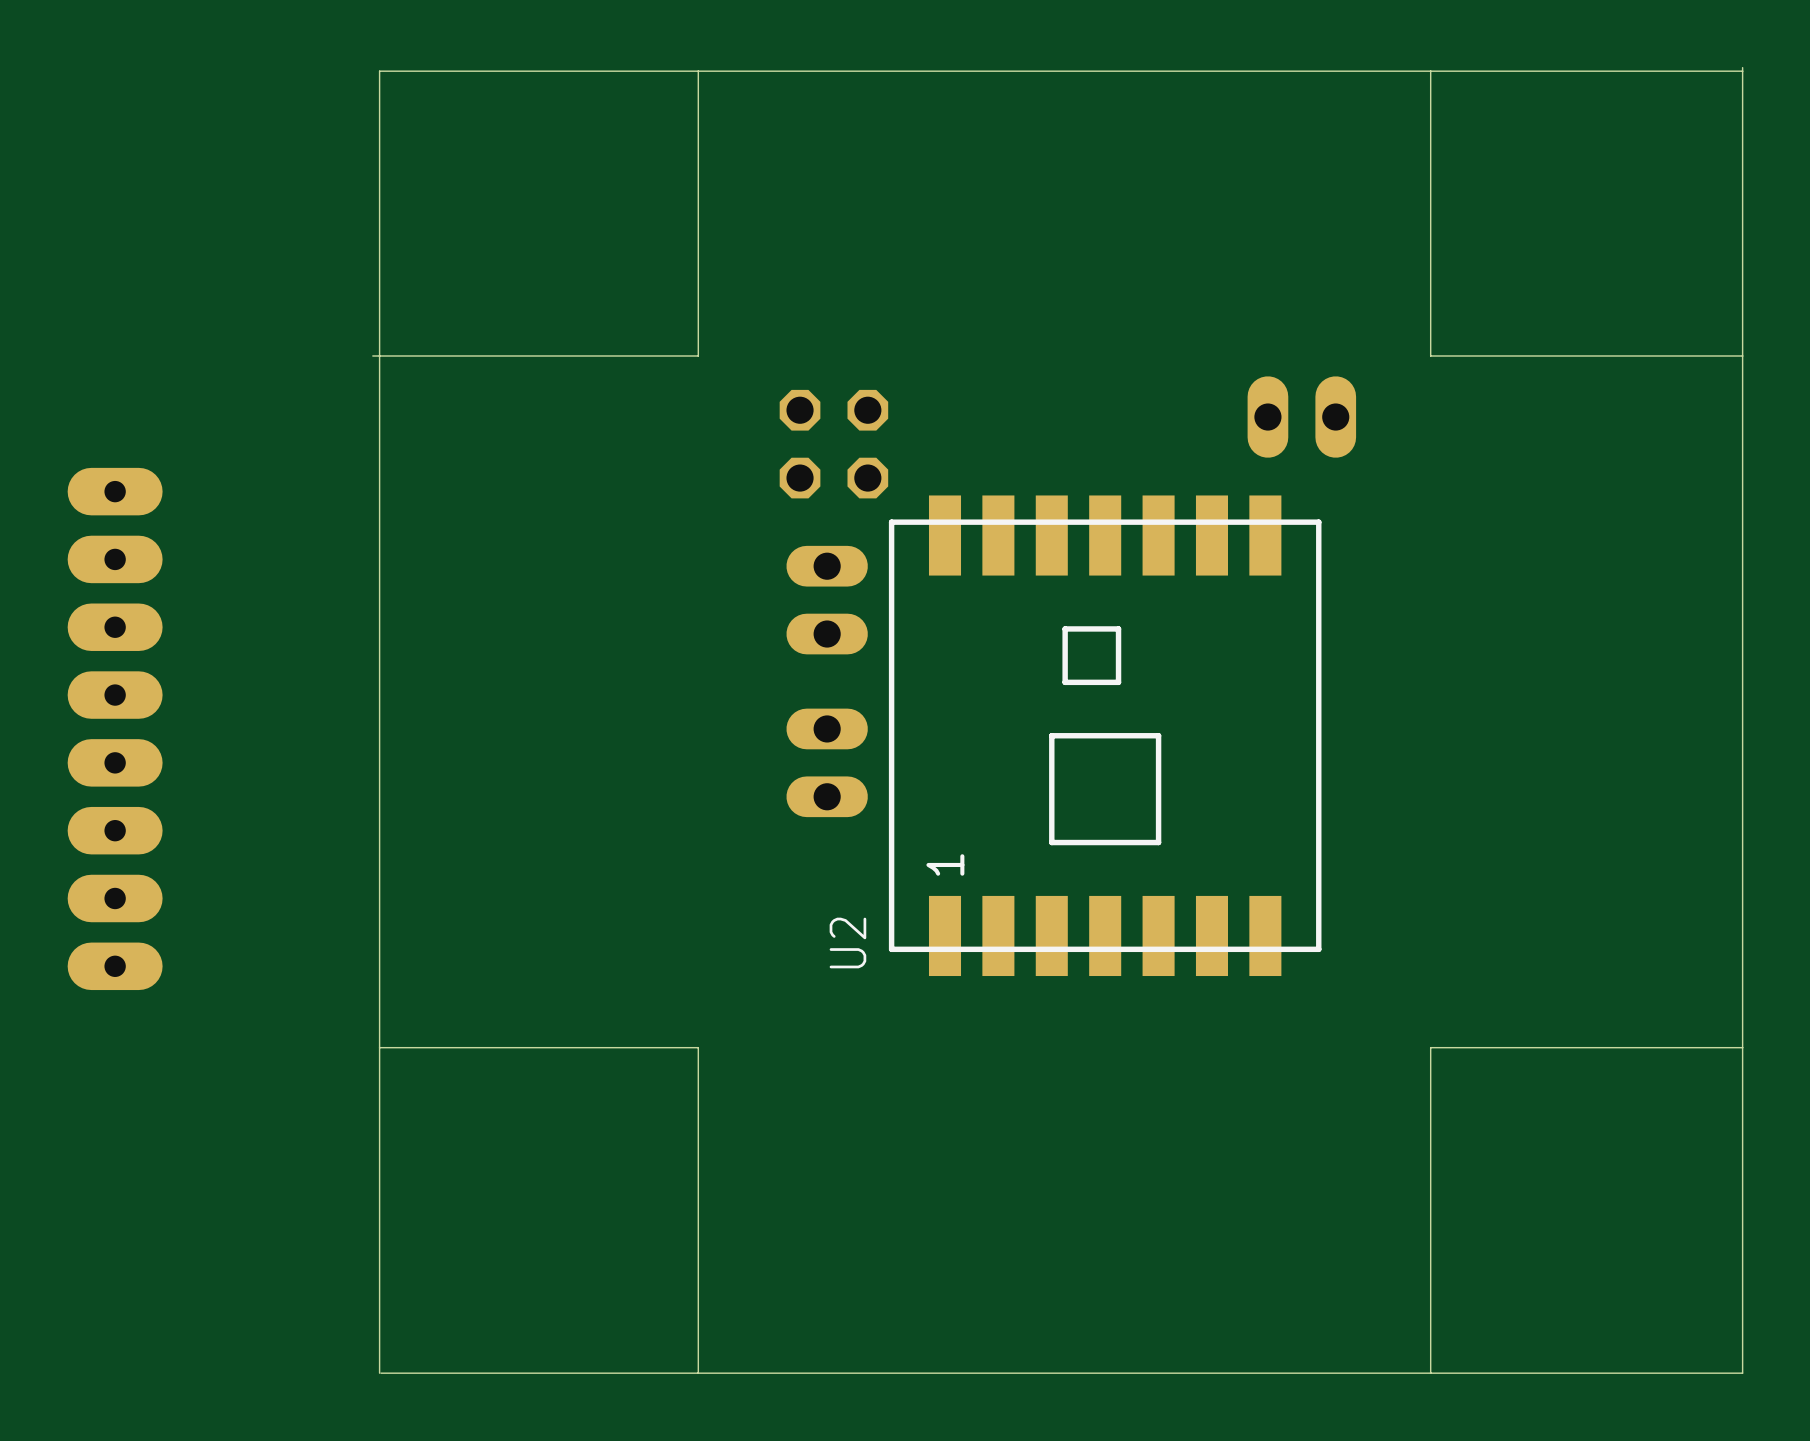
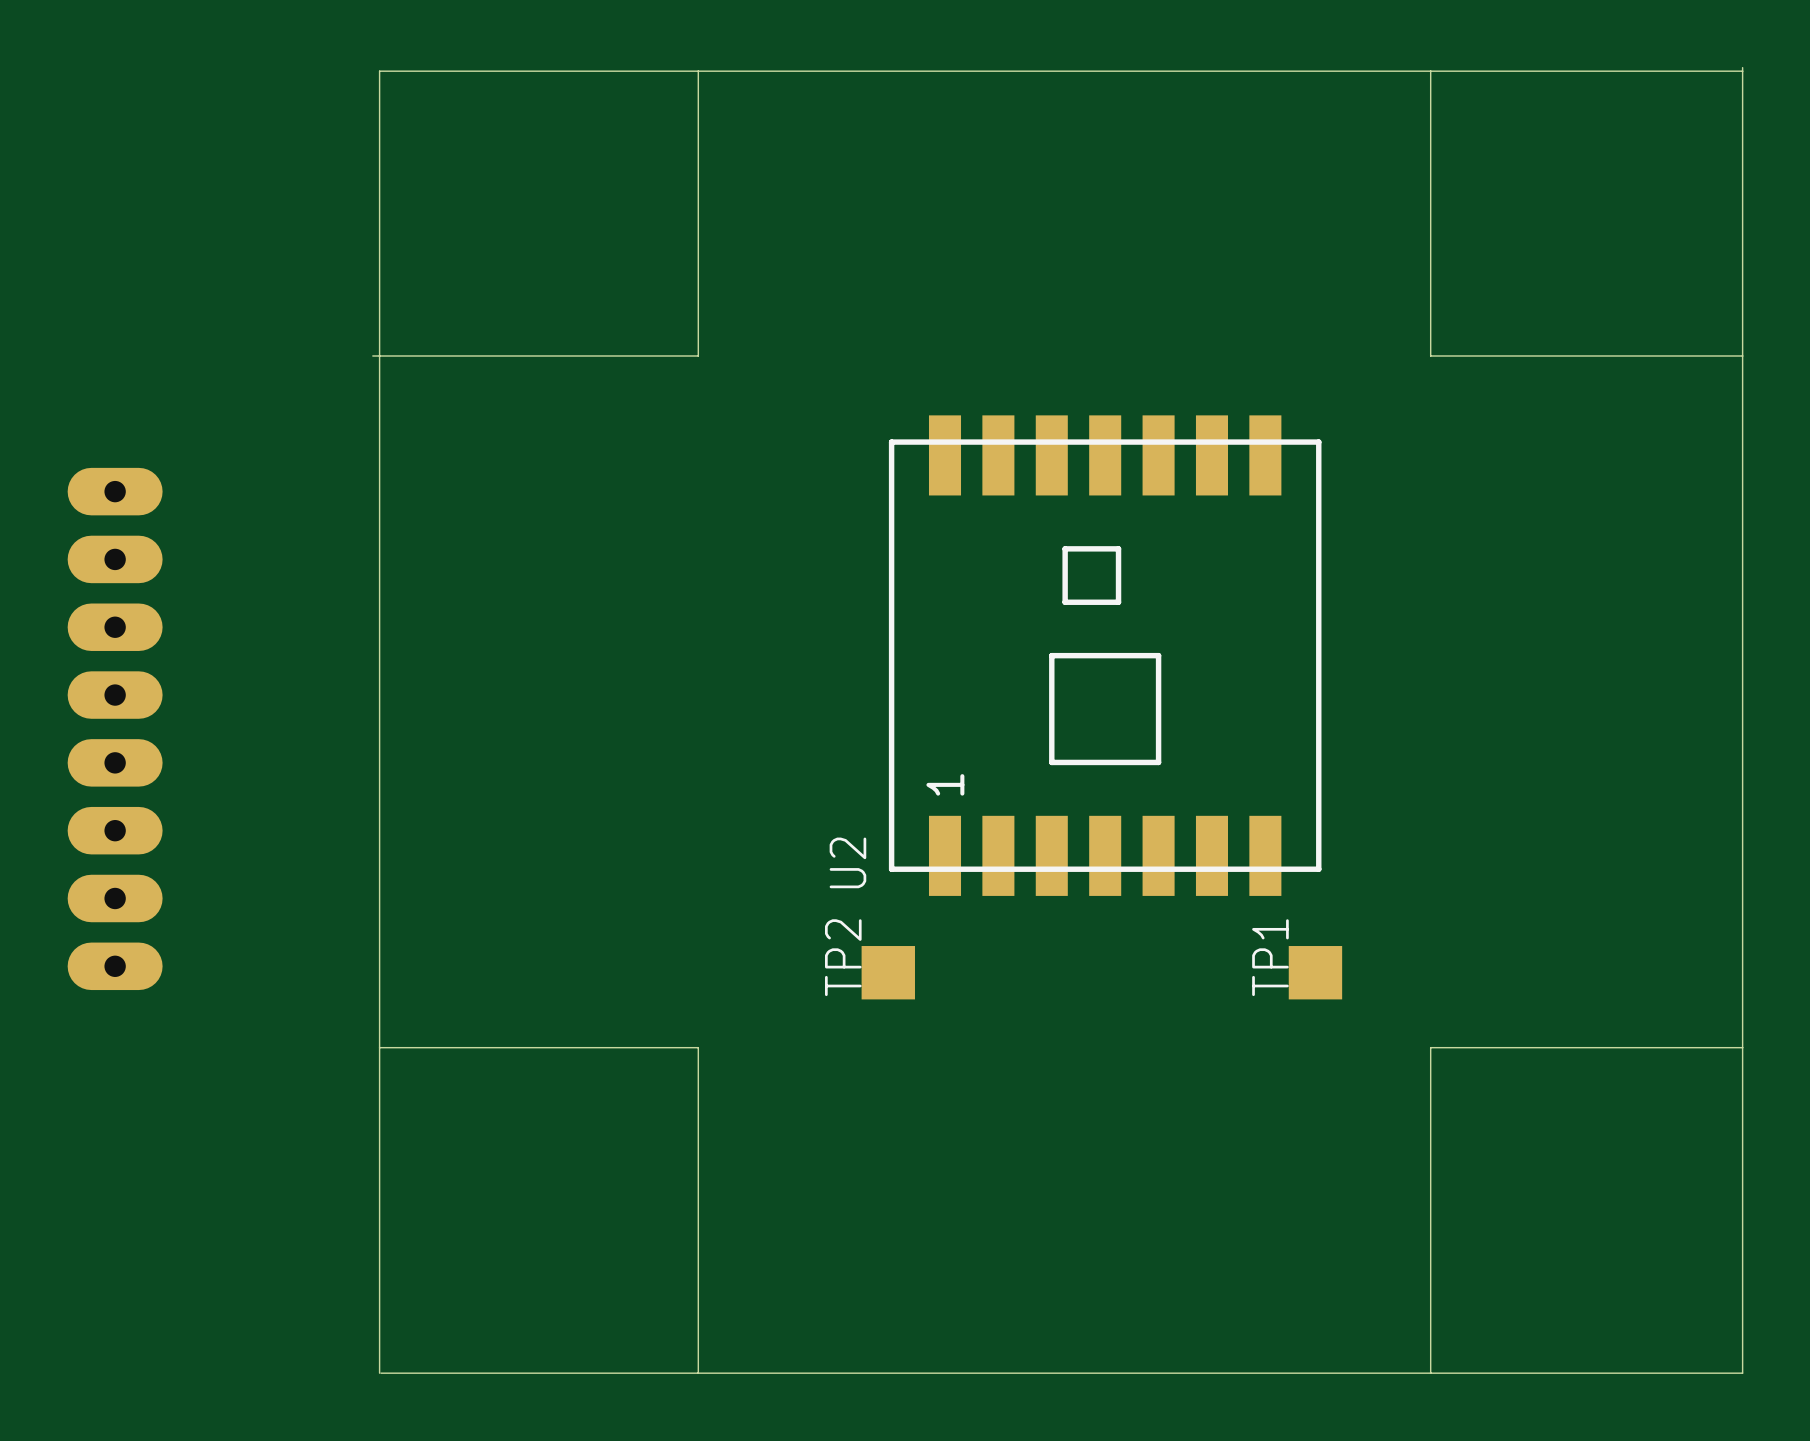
part: (1301, 417) -> none
part: (833, 444) -> none
part: (827, 600) -> none
U2 position: (1105, 735) -> (1105, 655)
part: (827, 762) -> none
TP2: none -> (888, 972)
TP1: none -> (1315, 972)

